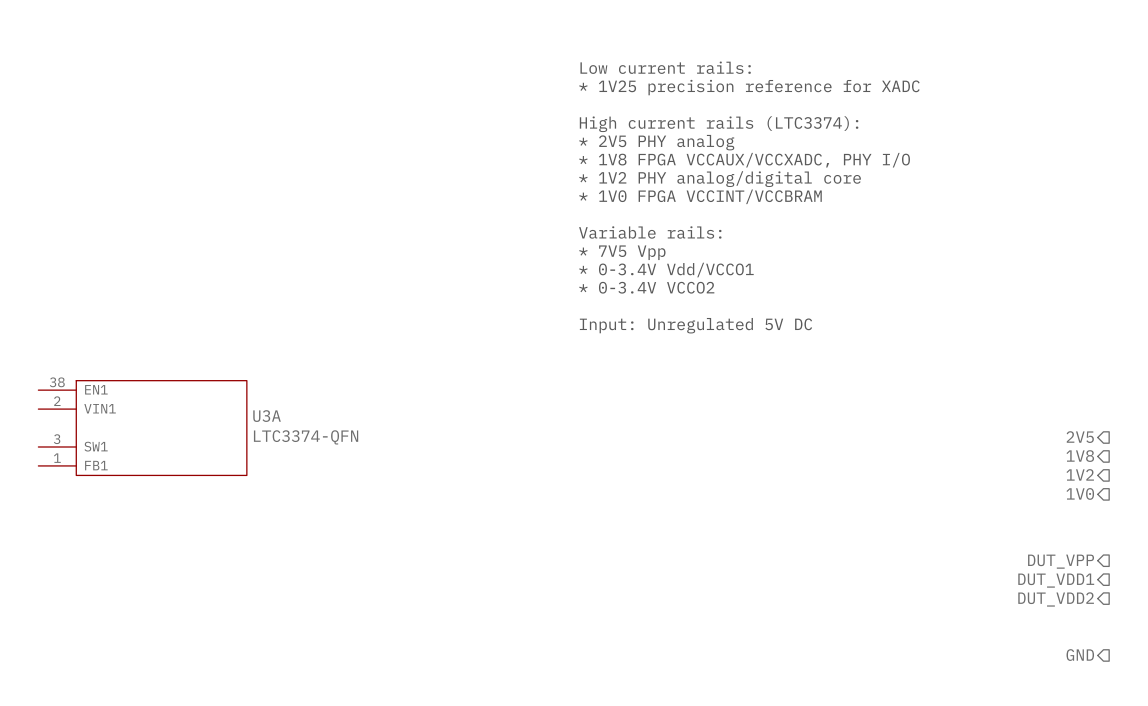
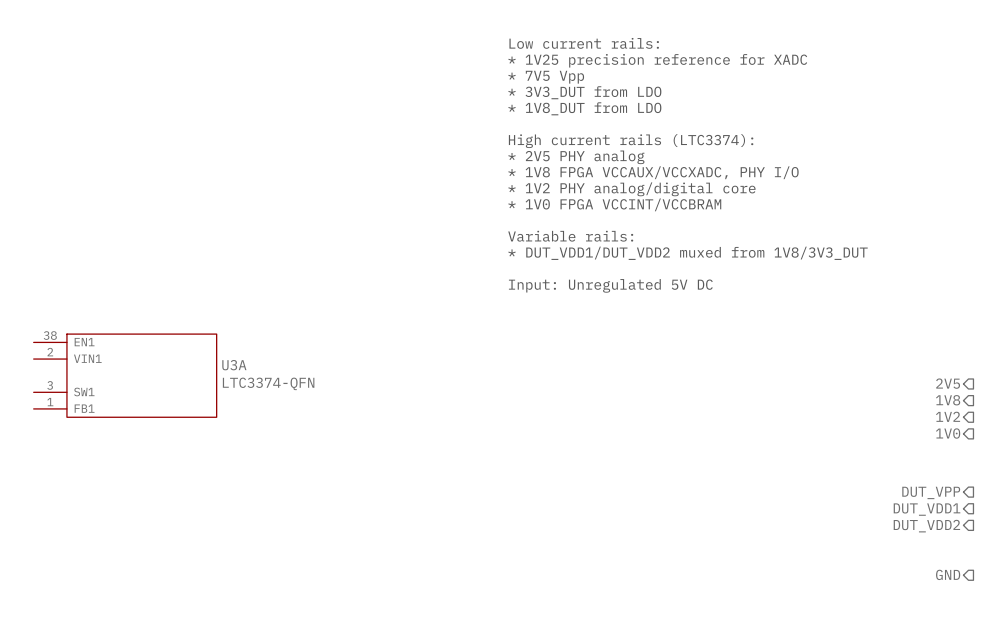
text: none -> Low current rails: (584, 43)
text: Low current rails: (665, 67) -> * 1V25 precision reference for XADC (657, 60)
text: * 1V25 precision reference for XADC (749, 87) -> * 7V5 Vpp (546, 77)
text: none -> * 3V3_DUT from LDO (584, 92)
text: High current rails (LTC3374): (719, 124) -> * 1V8_DUT from LDO (584, 108)
text: * 2V5 PHY analog (656, 142) -> none
text: * 1V8 FPGA VCCAUX/VCCXADC, PHY I/O (744, 160) -> High current rails (LTC3374): (631, 141)
text: * 1V2 PHY analog/digital core (720, 179) -> * 2V5 PHY analog (576, 157)
text: * 1V0 FPGA VCCINT/VCCBRAM (700, 196) -> * 1V8 FPGA VCCAUX/VCCXADC, PHY I/O (653, 172)
text: none -> * 1V2 PHY analog/digital core (631, 189)
text: Variable rails: (650, 232) -> * 1V0 FPGA VCCINT/VCCBRAM (614, 204)
text: * 7V5 Vpp (622, 252) -> none
text: * 0-3.4V Vdd/VCCO1 (666, 270) -> Variable rails: (570, 236)
text: * 0-3.4V VCCO2 (646, 287) -> * DUT_VDD1/DUT_VDD2 muxed from 1V8/3V3_DUT (688, 253)

